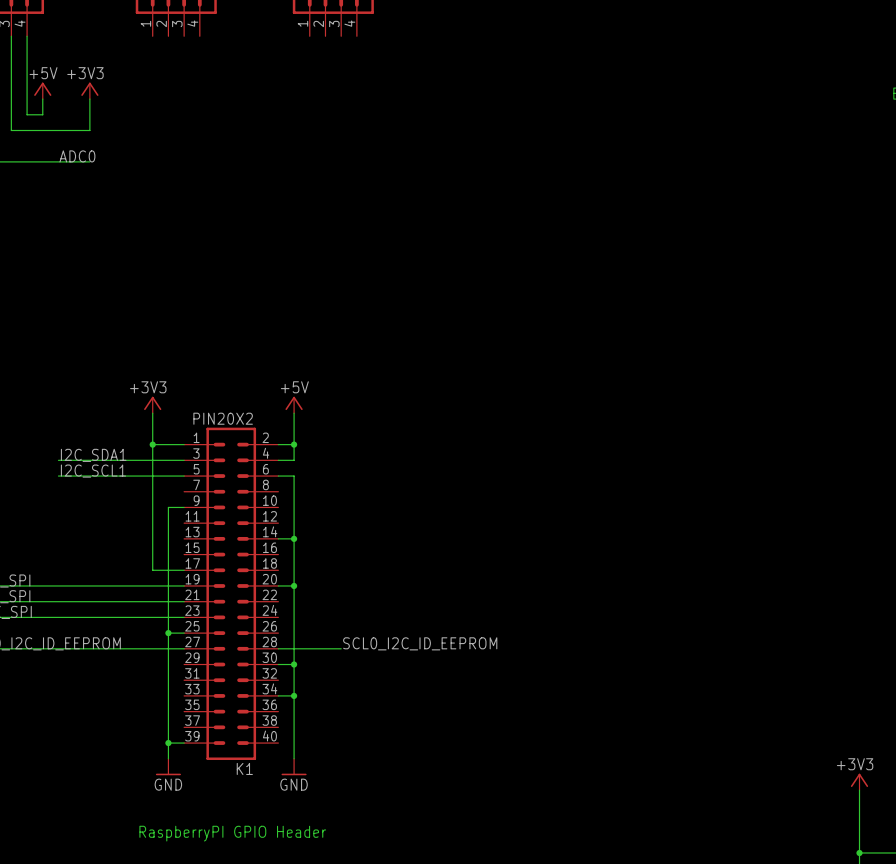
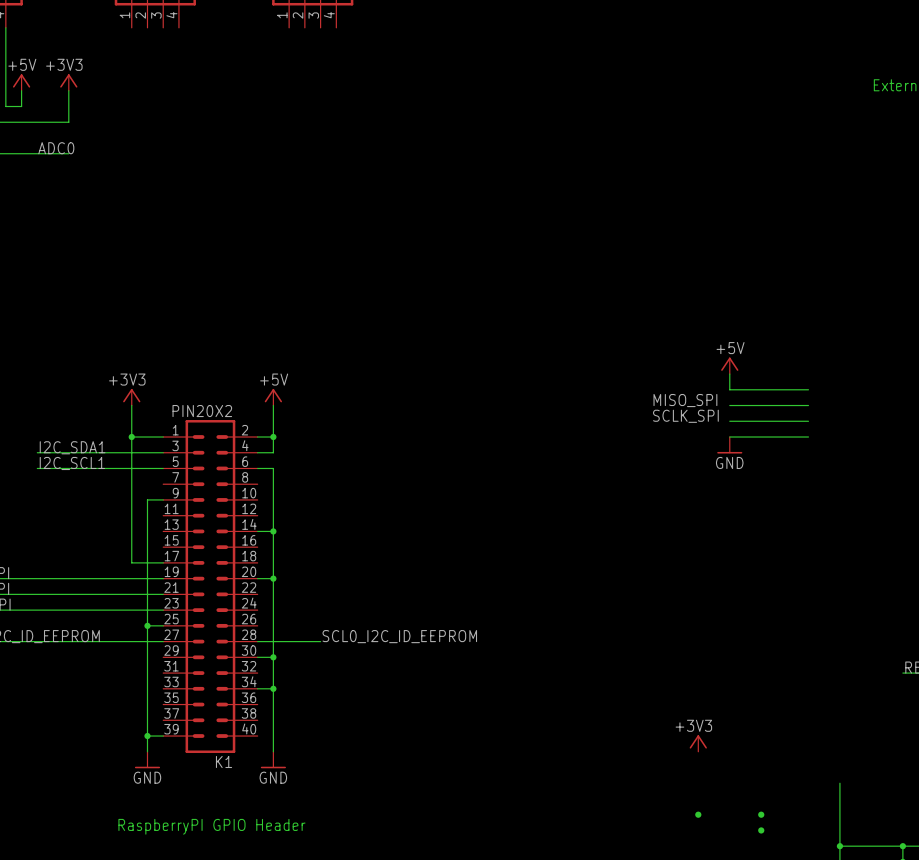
power symbol: none -> +5V (729, 365)
wire: none -> (729, 374) (729, 389) (808, 389)
label: none -> MISO_SPI (685, 400)
wire: none -> (729, 405) (808, 405)
label: none -> SCLK_SPI (685, 416)
wire: none -> (729, 421) (808, 421)
wire: none -> (729, 437) (808, 437)
power symbol: none -> GND (729, 445)
power symbol position: +3V3 (859, 781) -> +3V3 (698, 743)
junction: none -> (698, 814)
junction: none -> (761, 814)
junction: none -> (761, 830)

